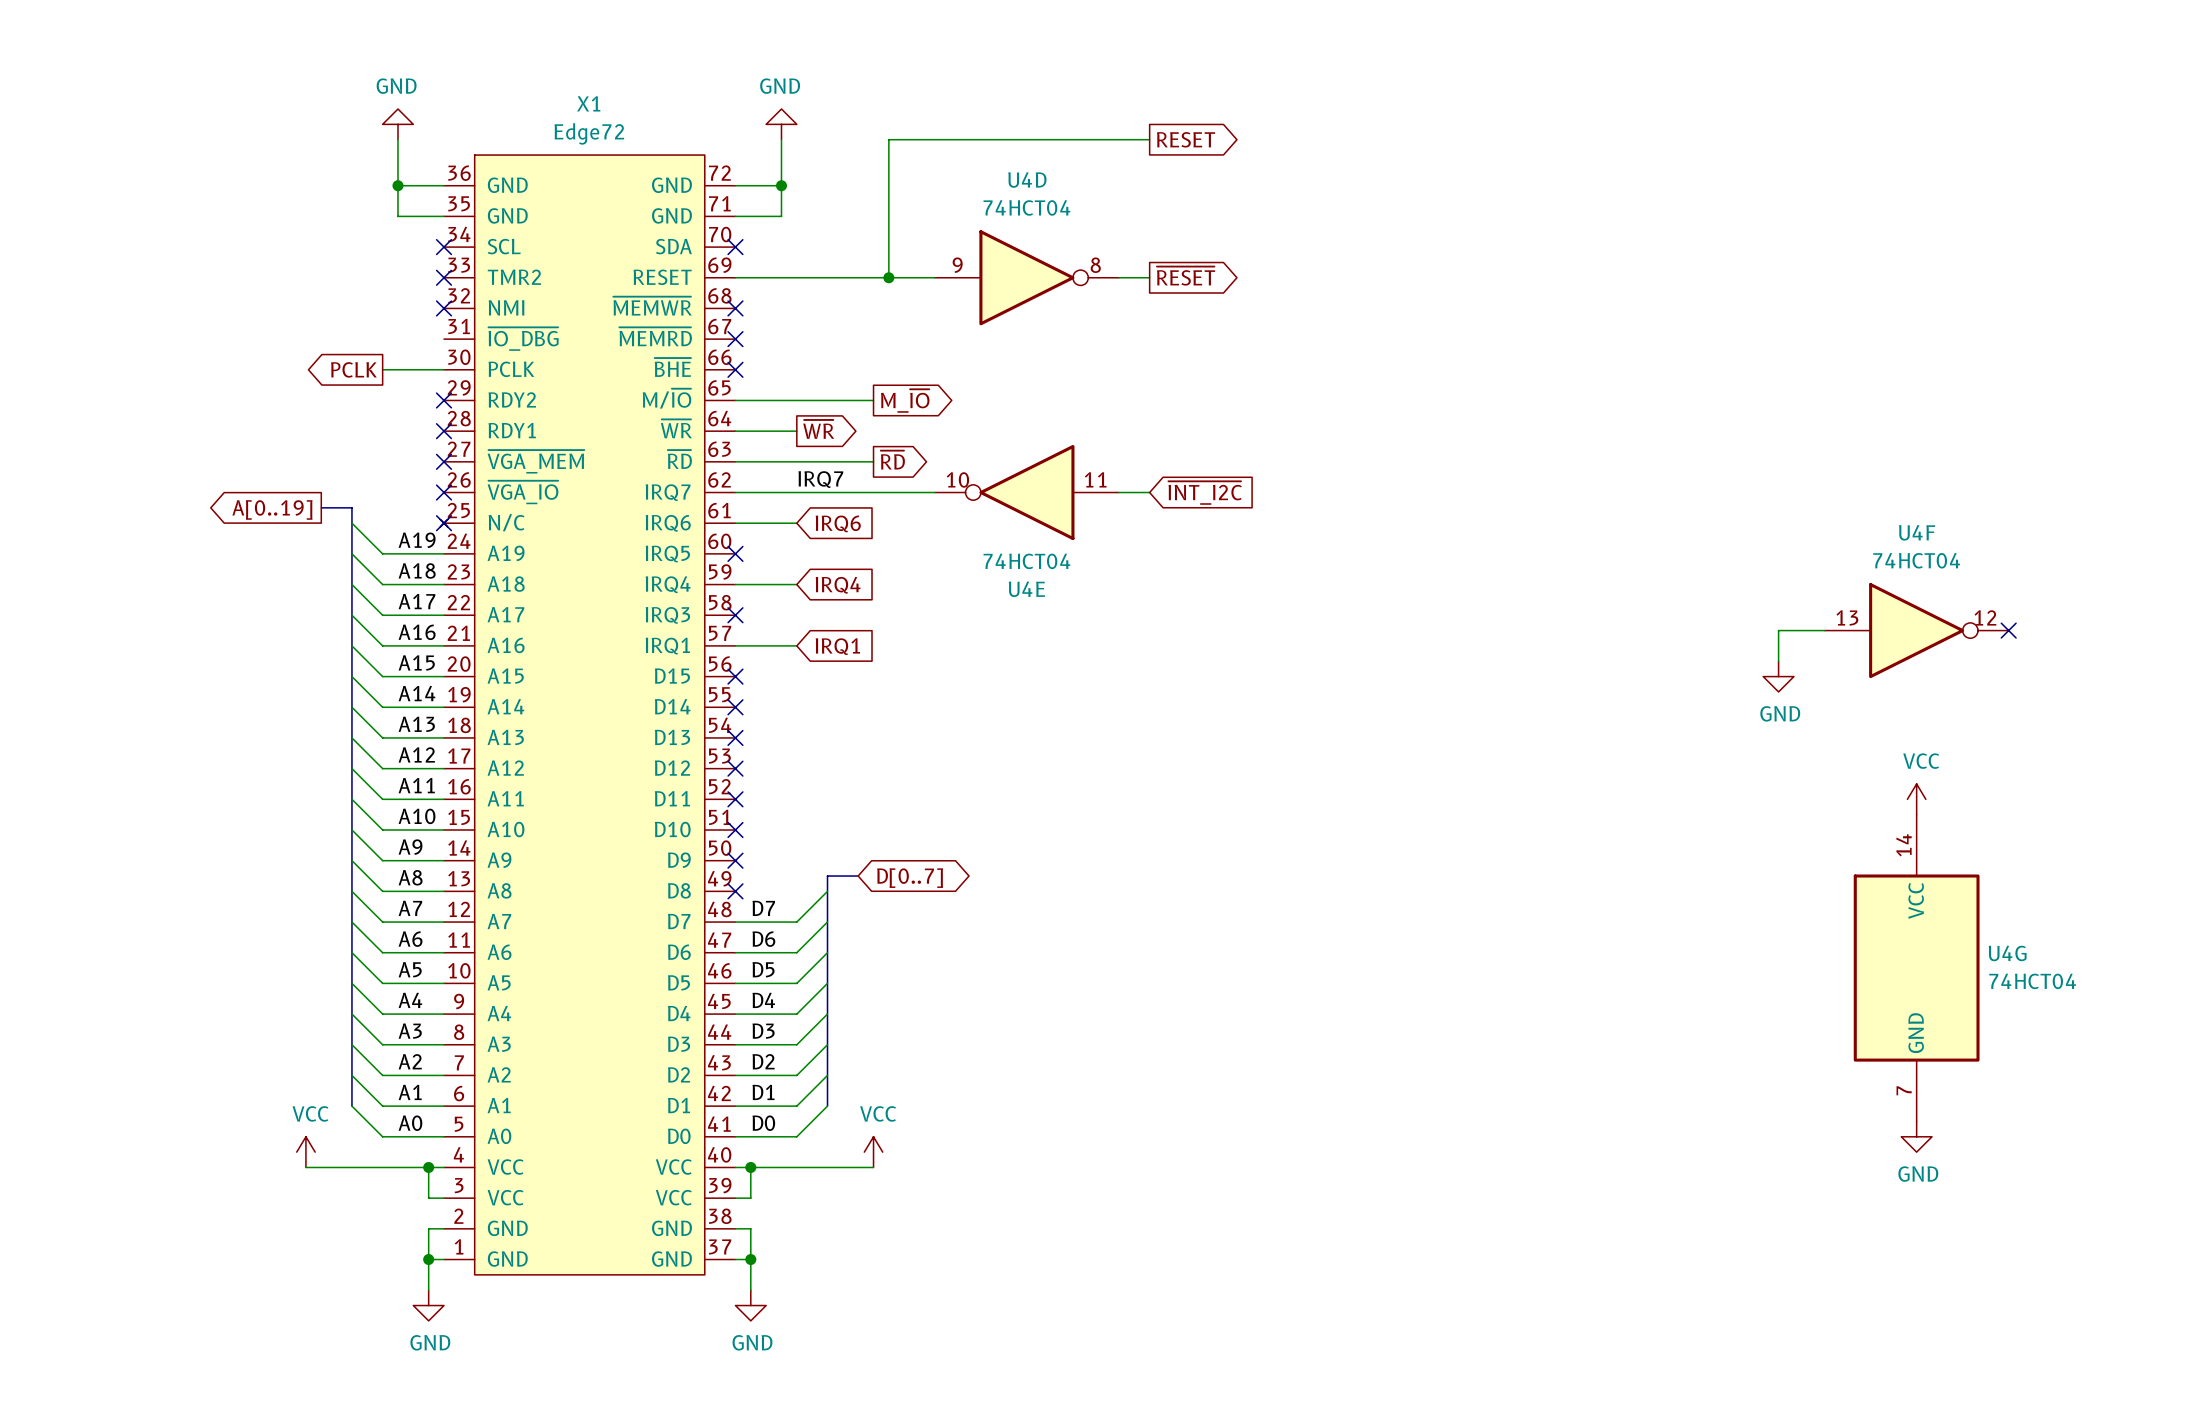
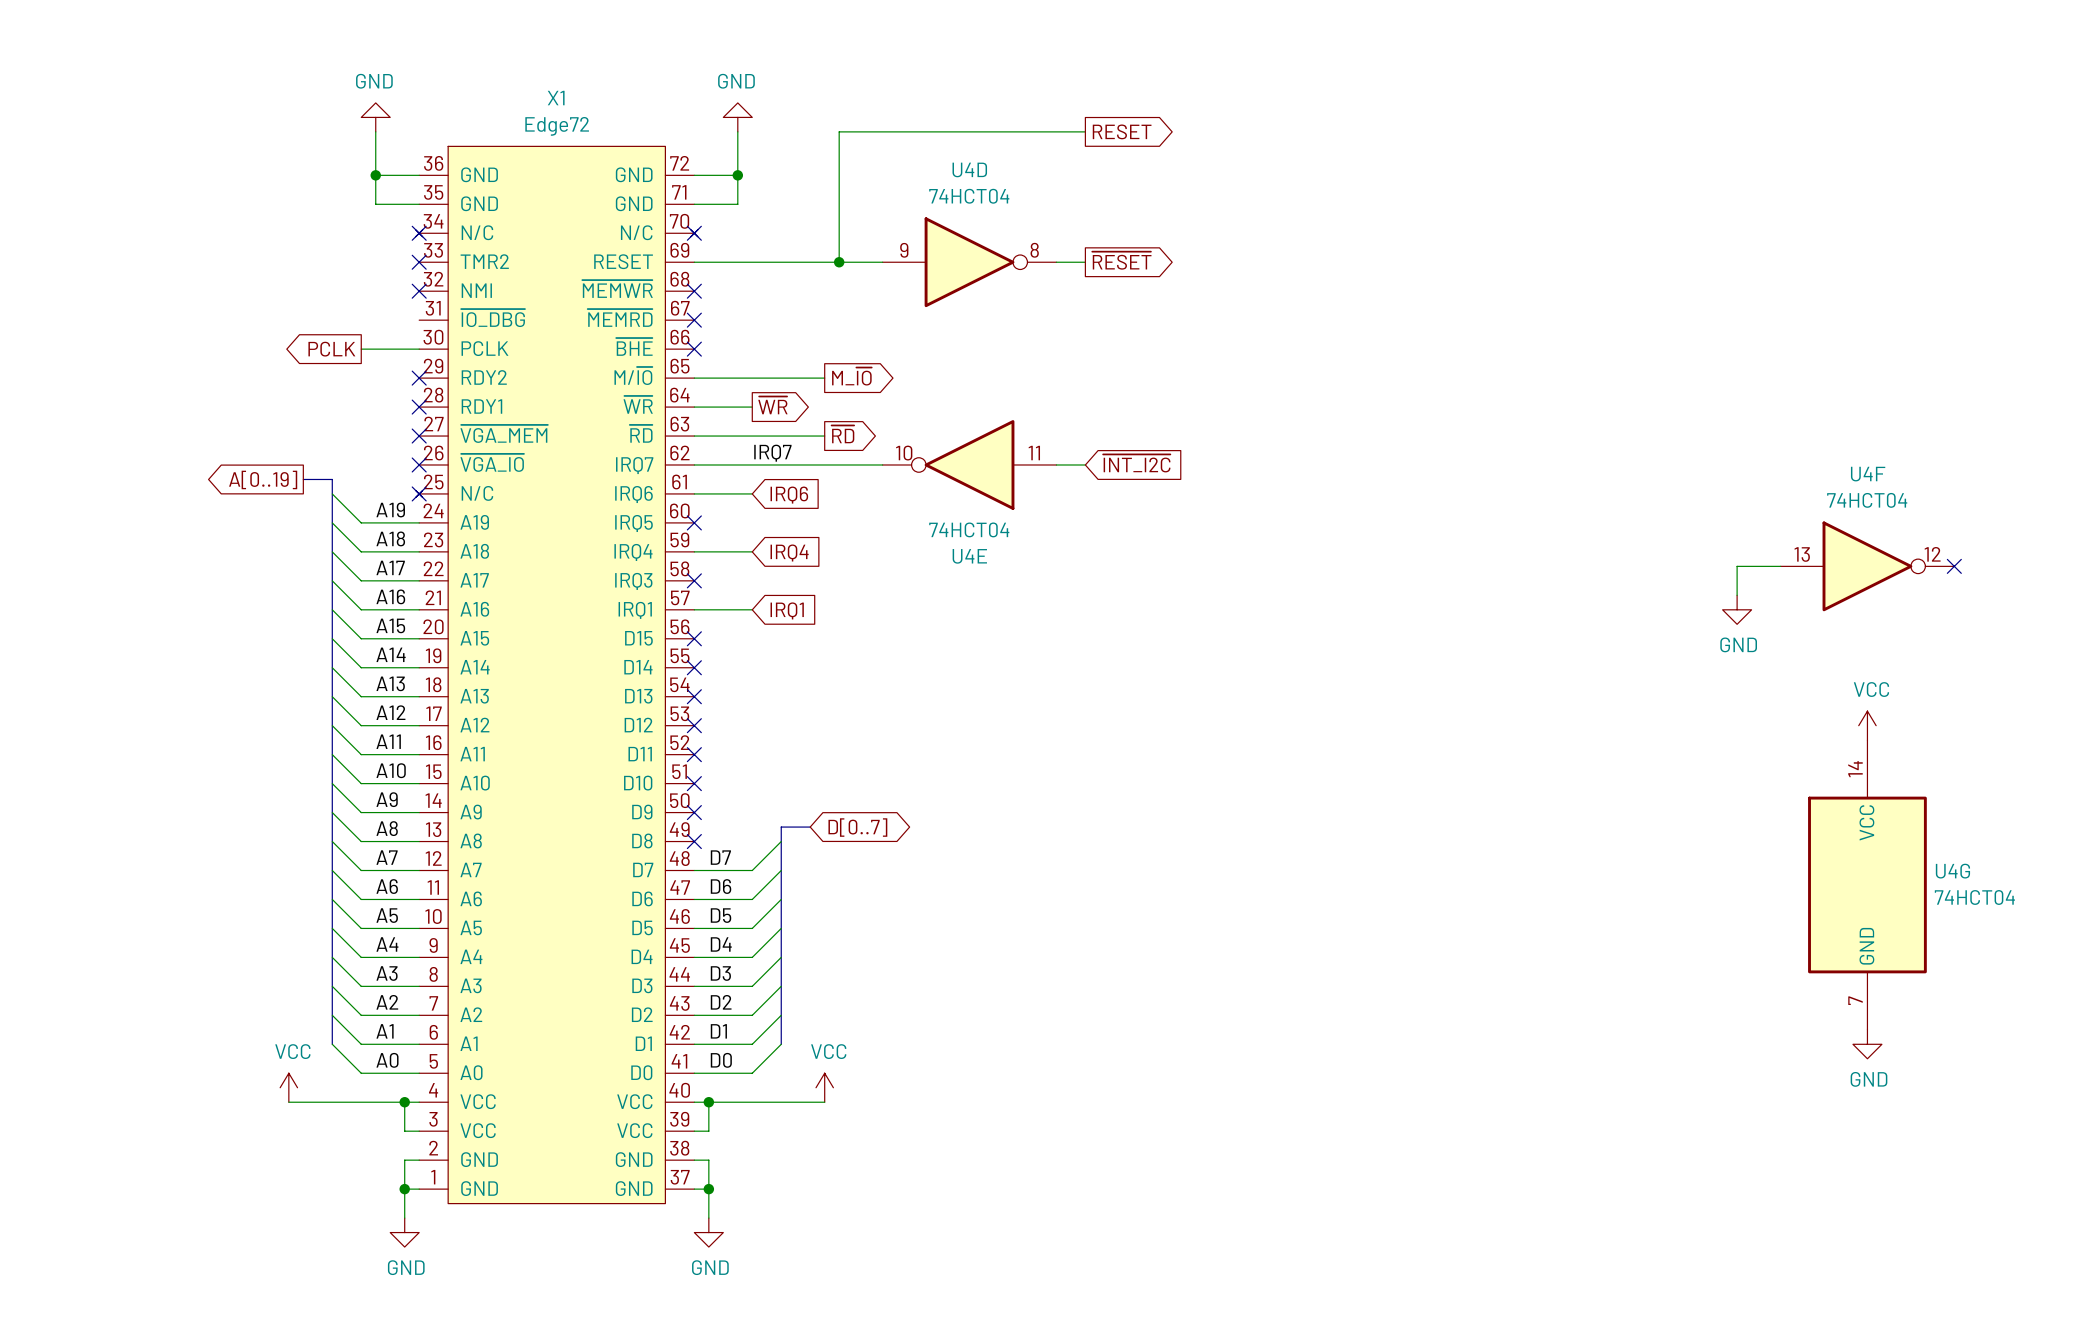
X1 symbol: [440, 155, 736, 1275] -> [415, 146, 698, 1204]
wire: (1824, 630) (1778, 630) (1778, 661) -> (1780, 566) (1737, 566) (1737, 595)
U4F position: (1916, 630) -> (1867, 566)
no-connect mark position: (2008, 630) -> (1954, 566)
power symbol position: GND (1778, 676) -> GND (1737, 609)
power symbol position: VCC (1916, 799) -> VCC (1867, 725)
U4G position: (1916, 968) -> (1867, 884)
power symbol position: GND (1916, 1136) -> GND (1867, 1044)

